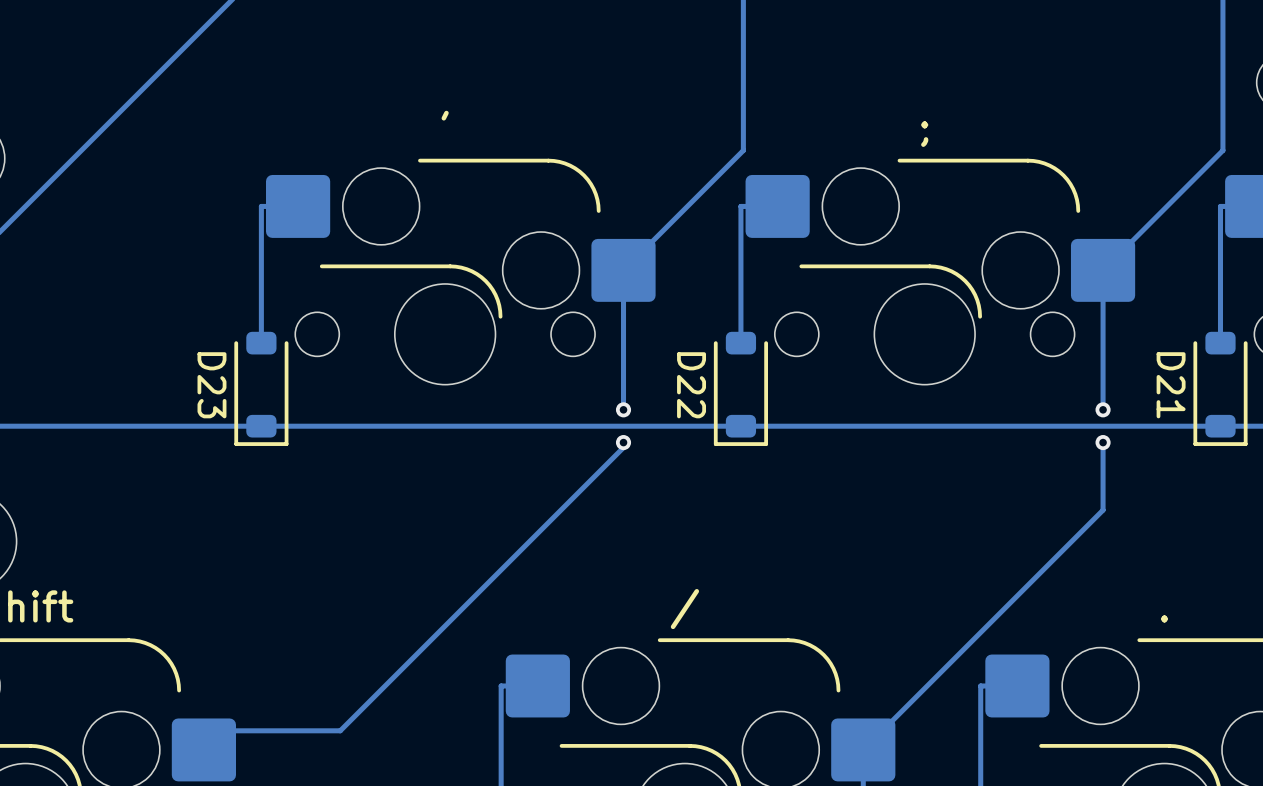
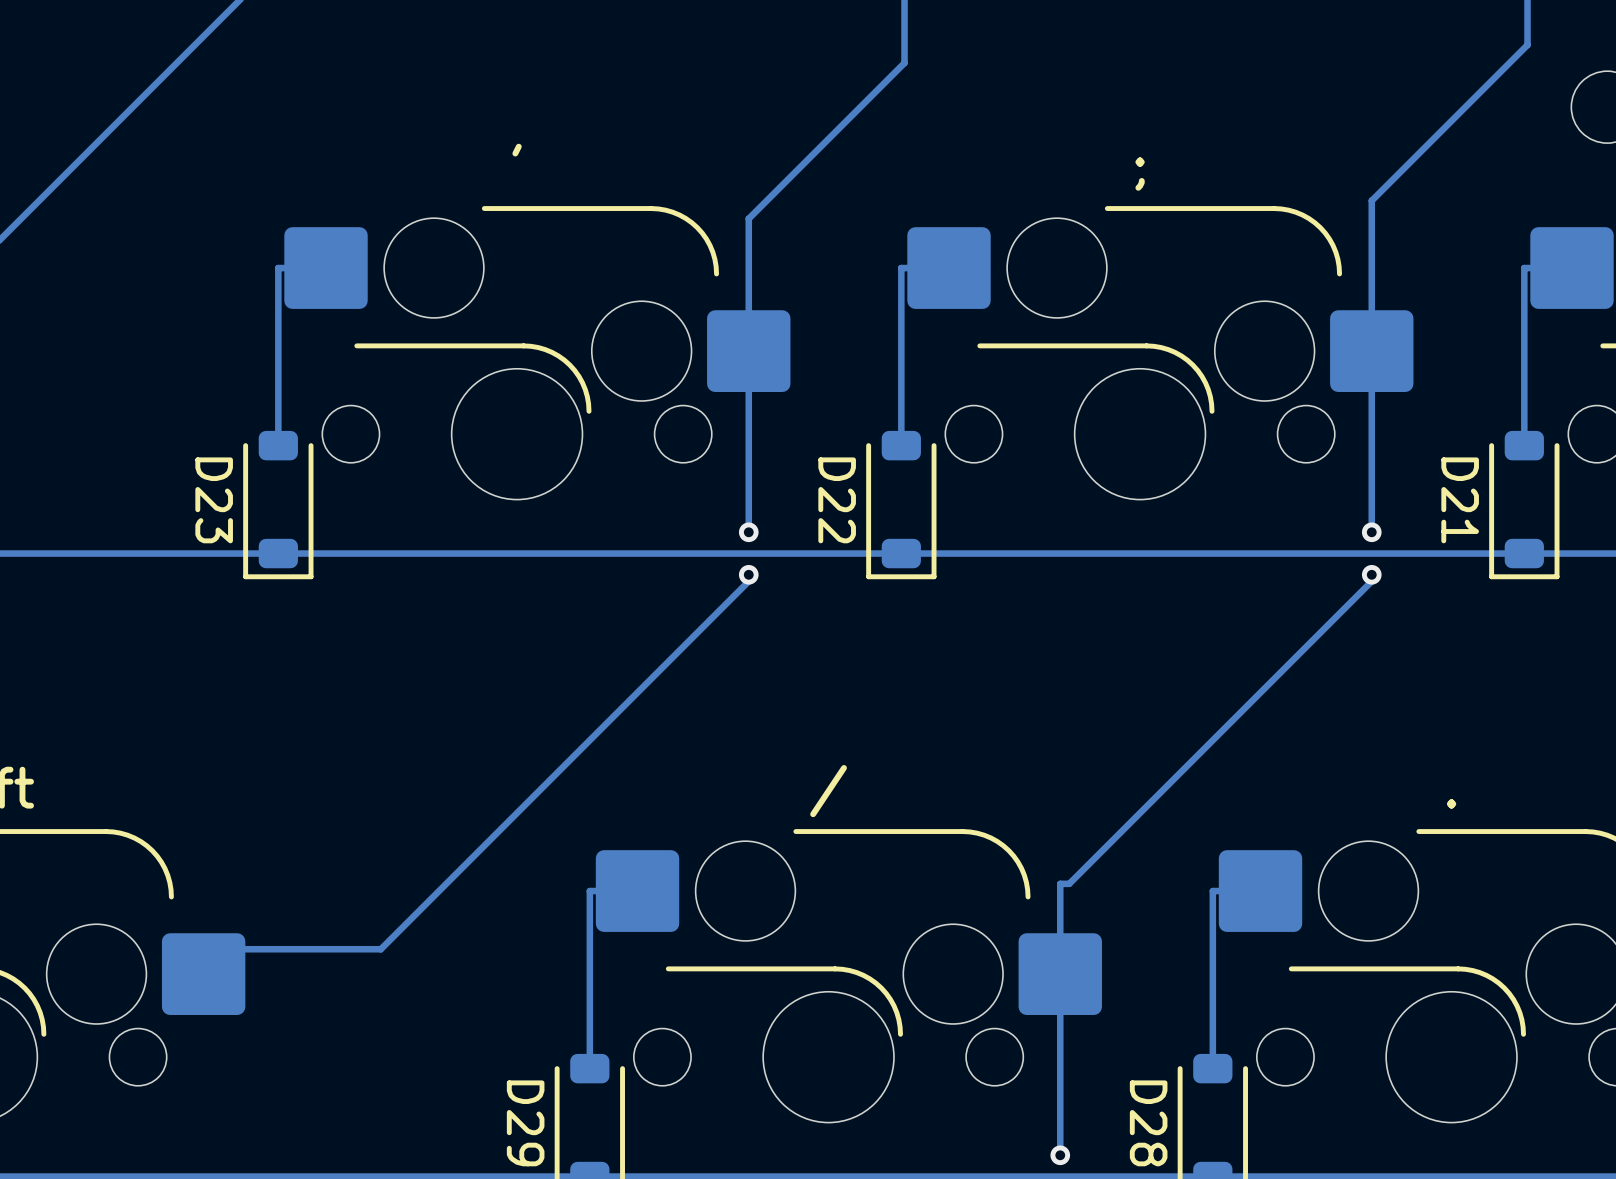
track: (1222, 34) (1222, 150) (1103, 270) -> (1527, 45) (1371, 200) (1371, 351)
track: (743, 48) (743, 150) (623, 270) -> (904, 62) (748, 218) (748, 351)
track: (1103, 447) (1103, 510) (863, 749) -> (1371, 581) (1069, 883) (1060, 883) (1060, 974)

